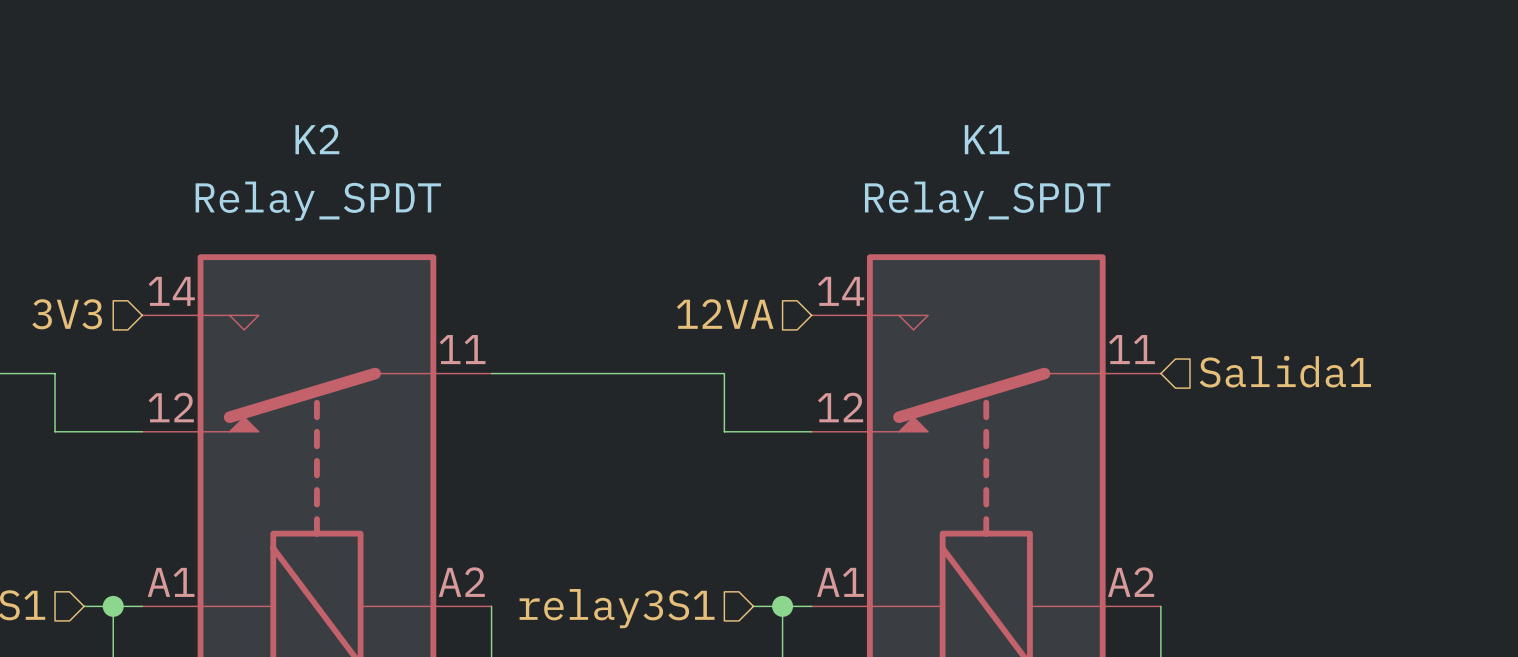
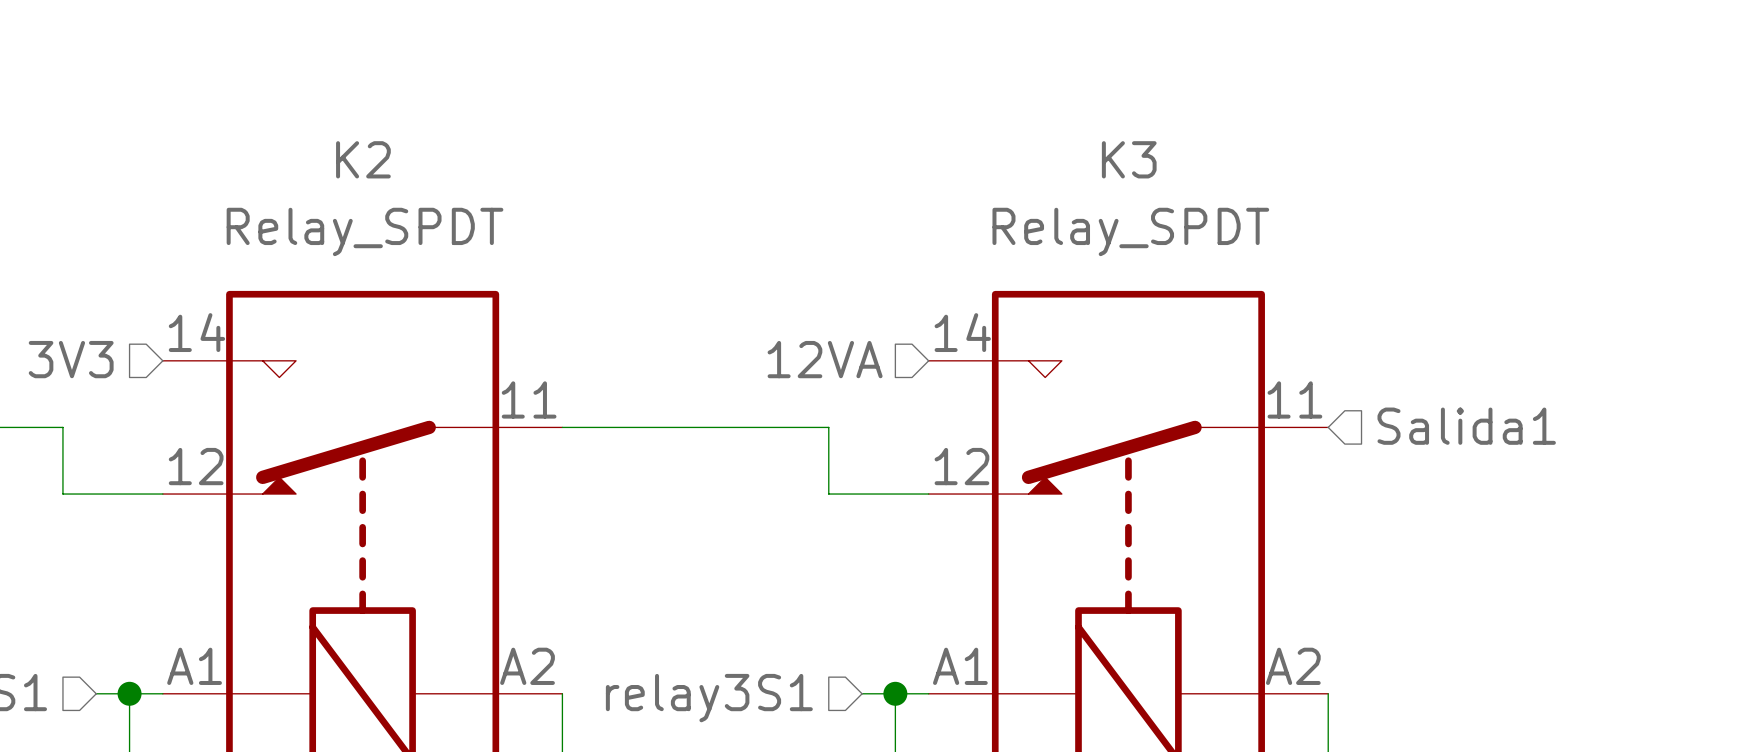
K1 name: K1 (987, 139) -> K3 (1129, 159)

